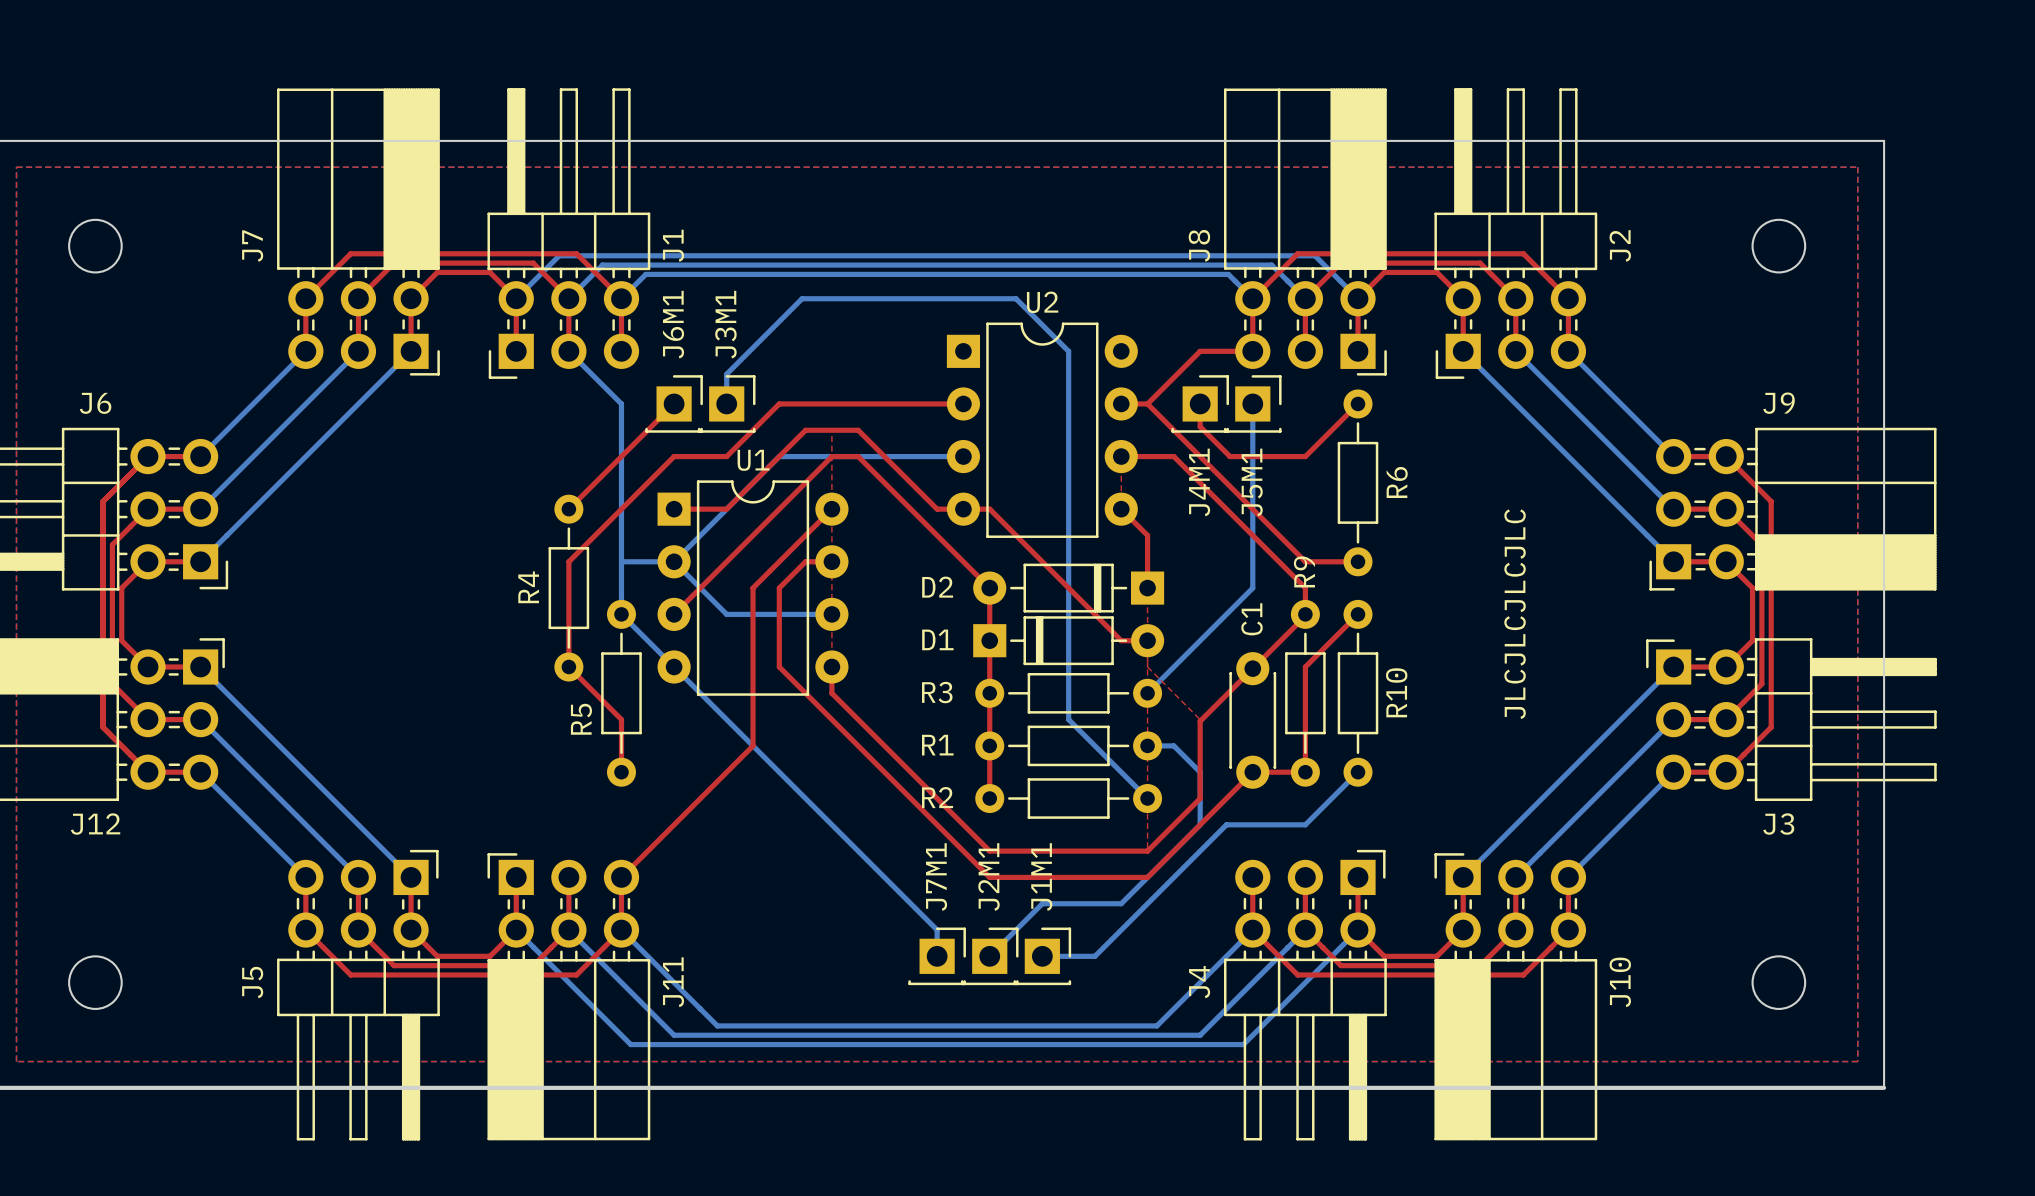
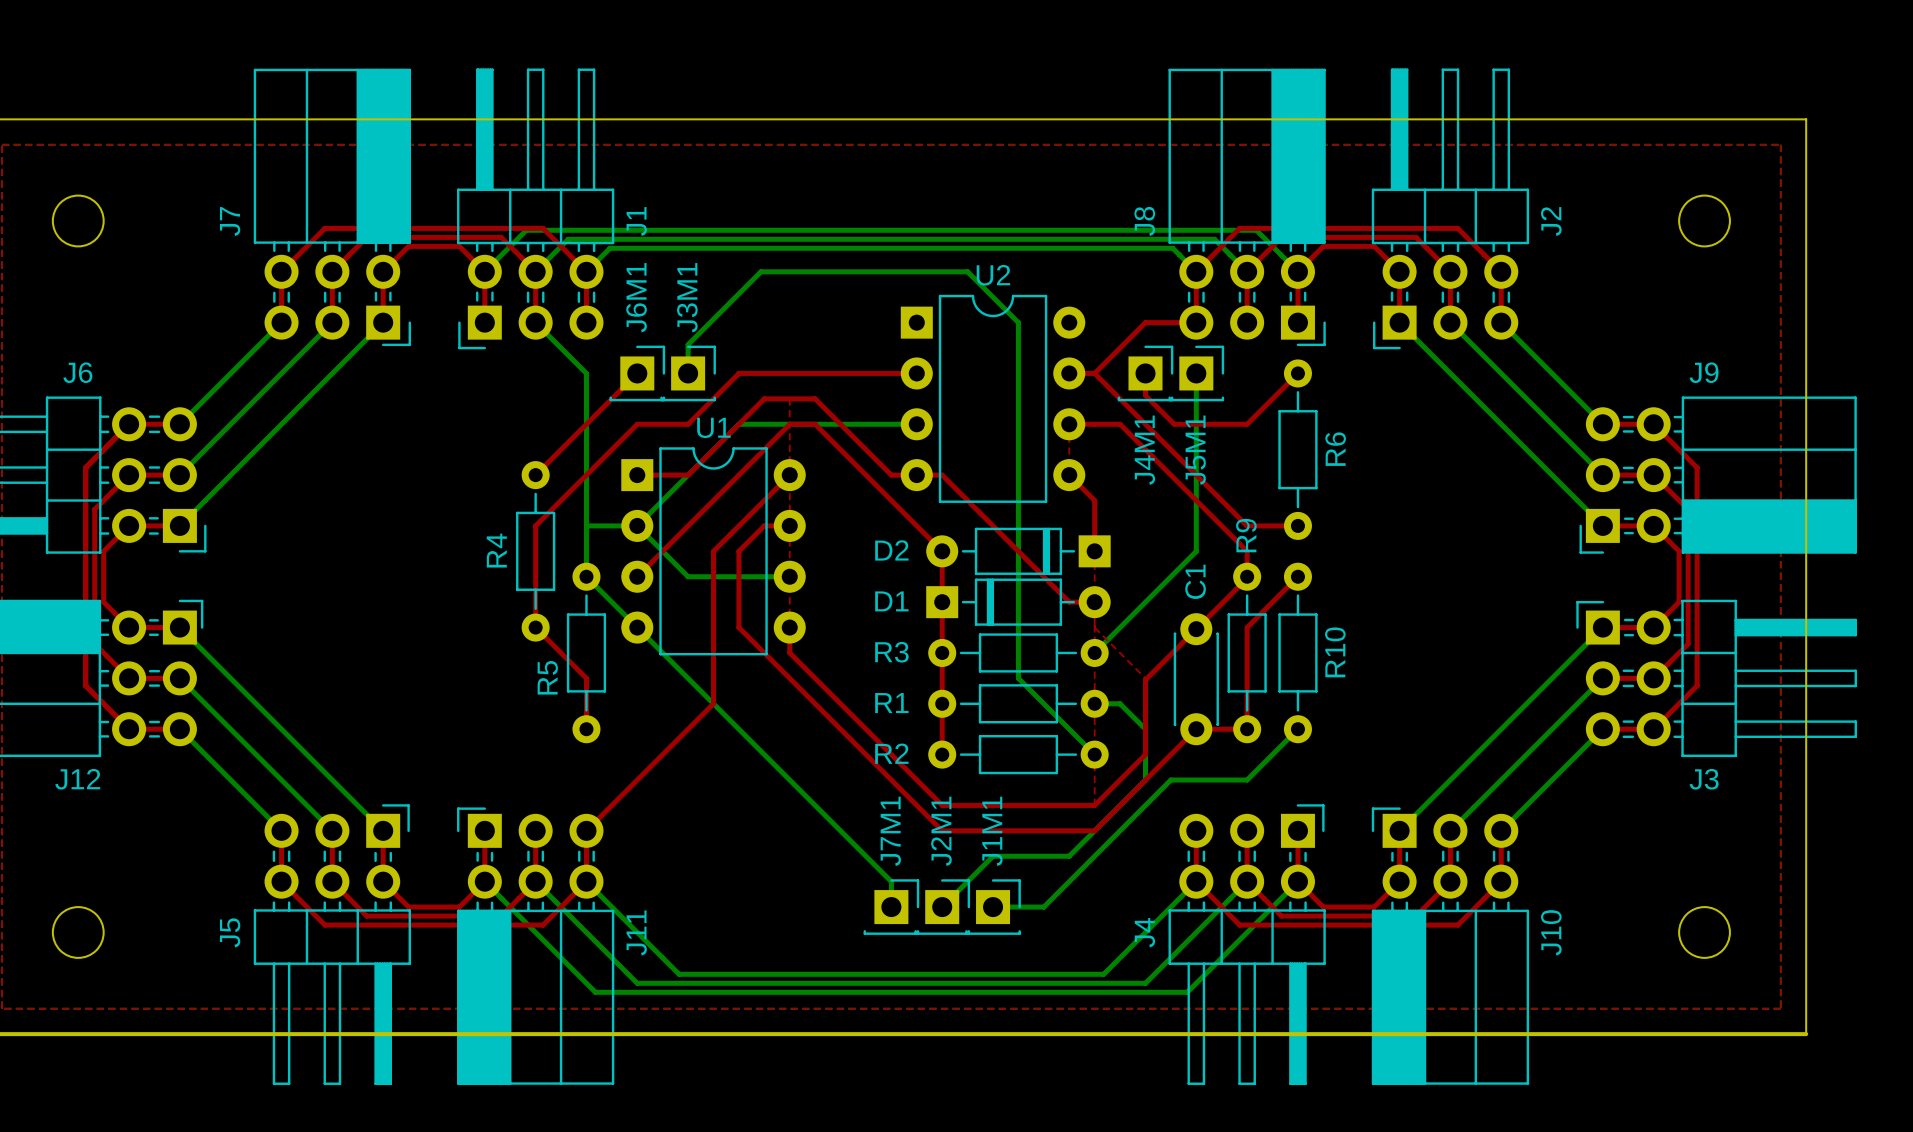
text: JLCJLCJLCJLC (1515, 614) -> none

